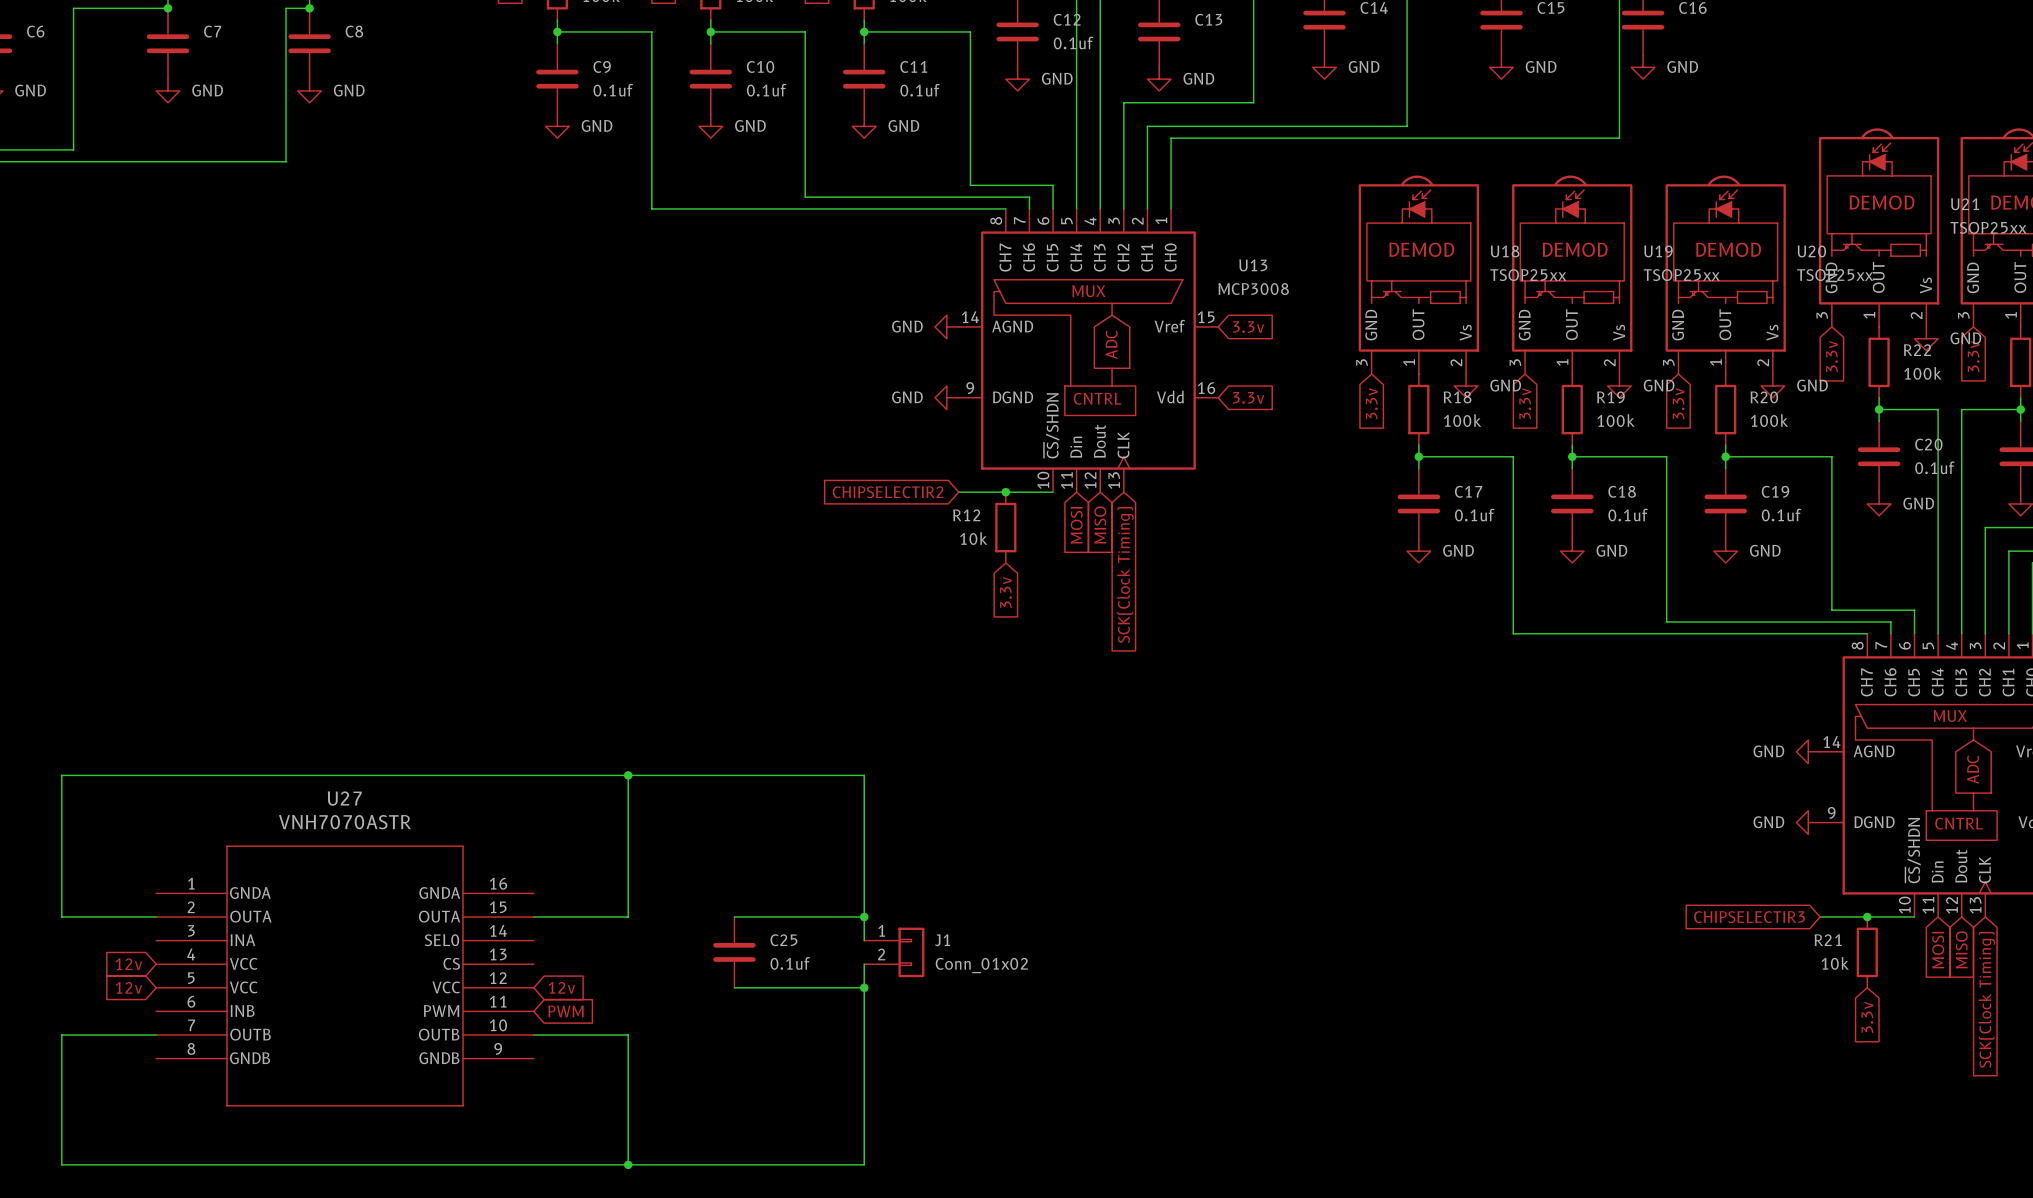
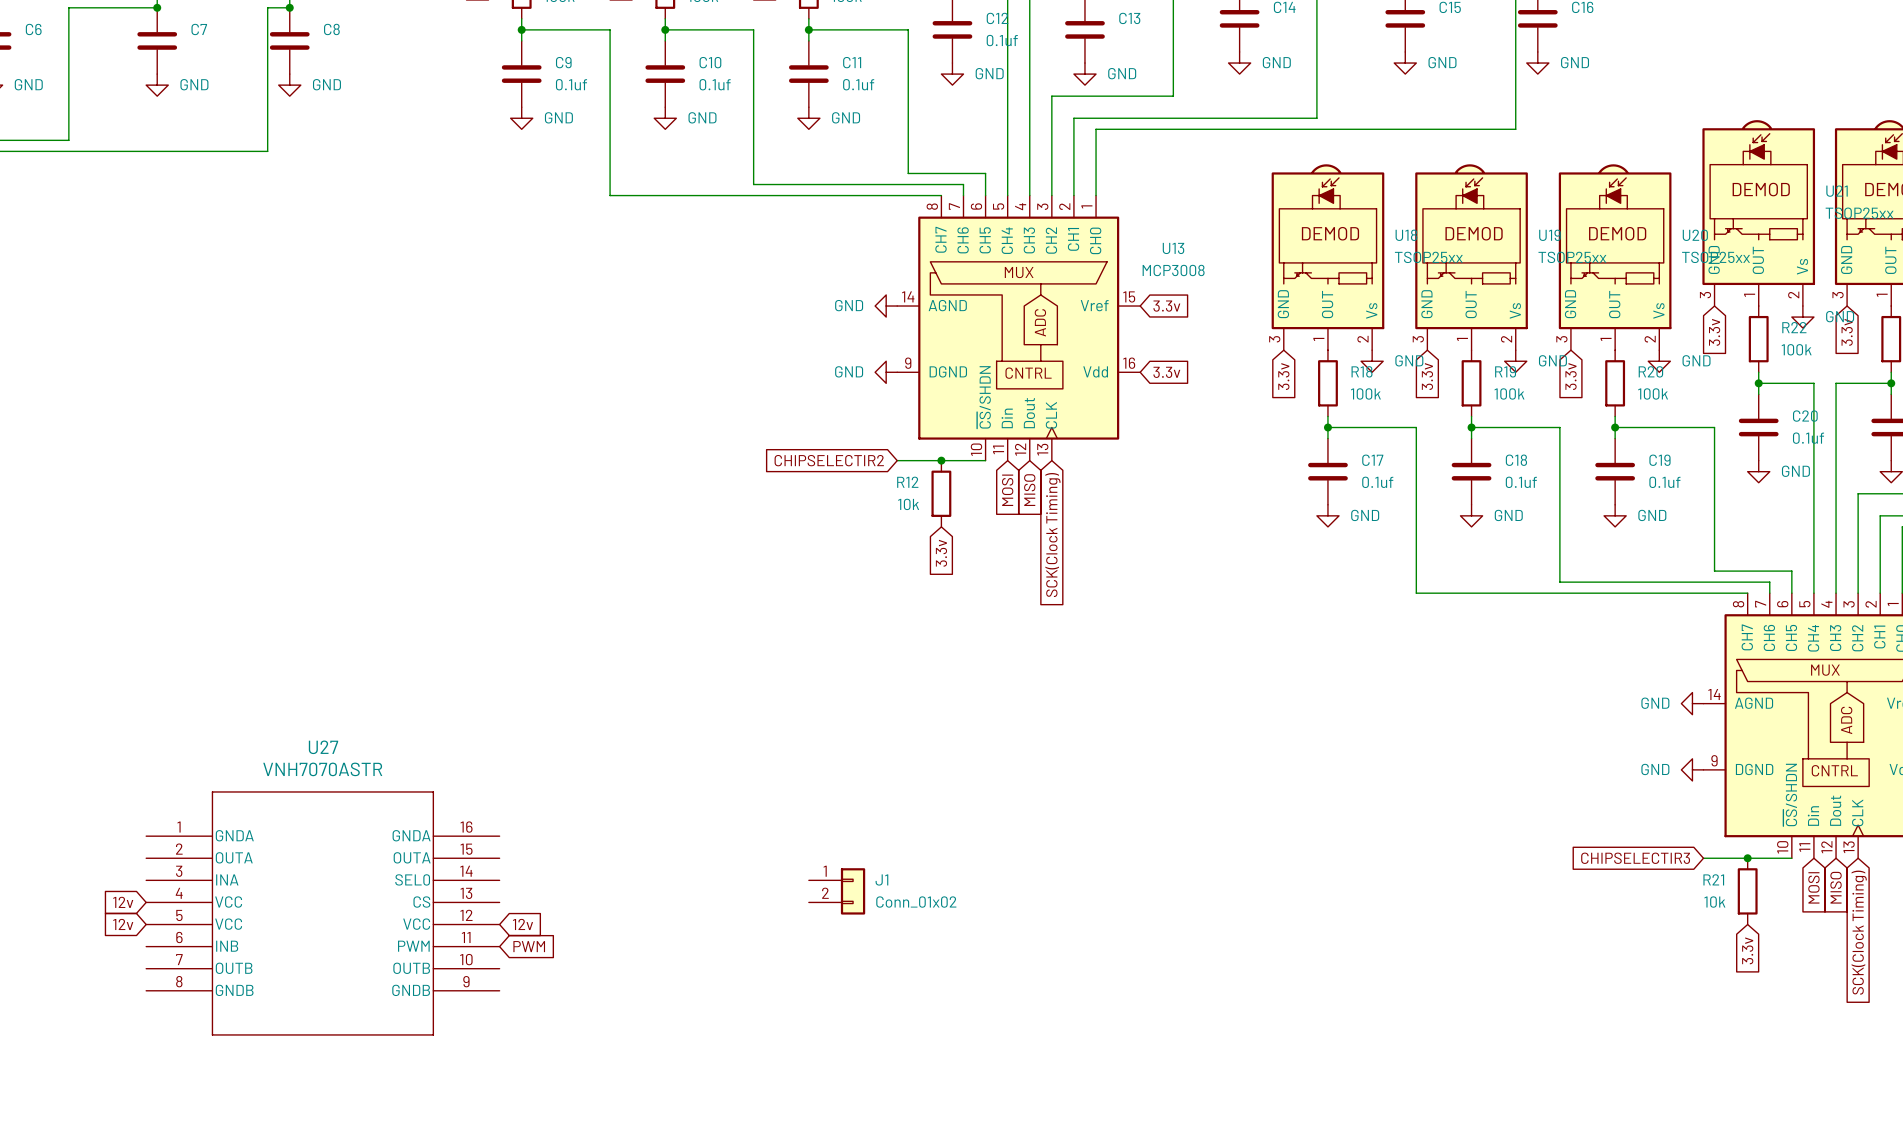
wire: (628, 775) (628, 917) (533, 917) -> none
junction: (628, 775) -> none
wire: (156, 917) (61, 917) (61, 775) (864, 775) (864, 940) -> none
wire: (734, 917) (864, 917) -> none
junction: (864, 917) -> none
C25: 0.1uf (734, 952) -> none
wire: (864, 964) (864, 1164) (61, 1164) (61, 1035) (156, 1035) -> none
wire: (734, 987) (864, 987) -> none
junction: (864, 987) -> none
wire: (533, 1035) (628, 1035) (628, 1164) -> none
junction: (628, 1164) -> none

